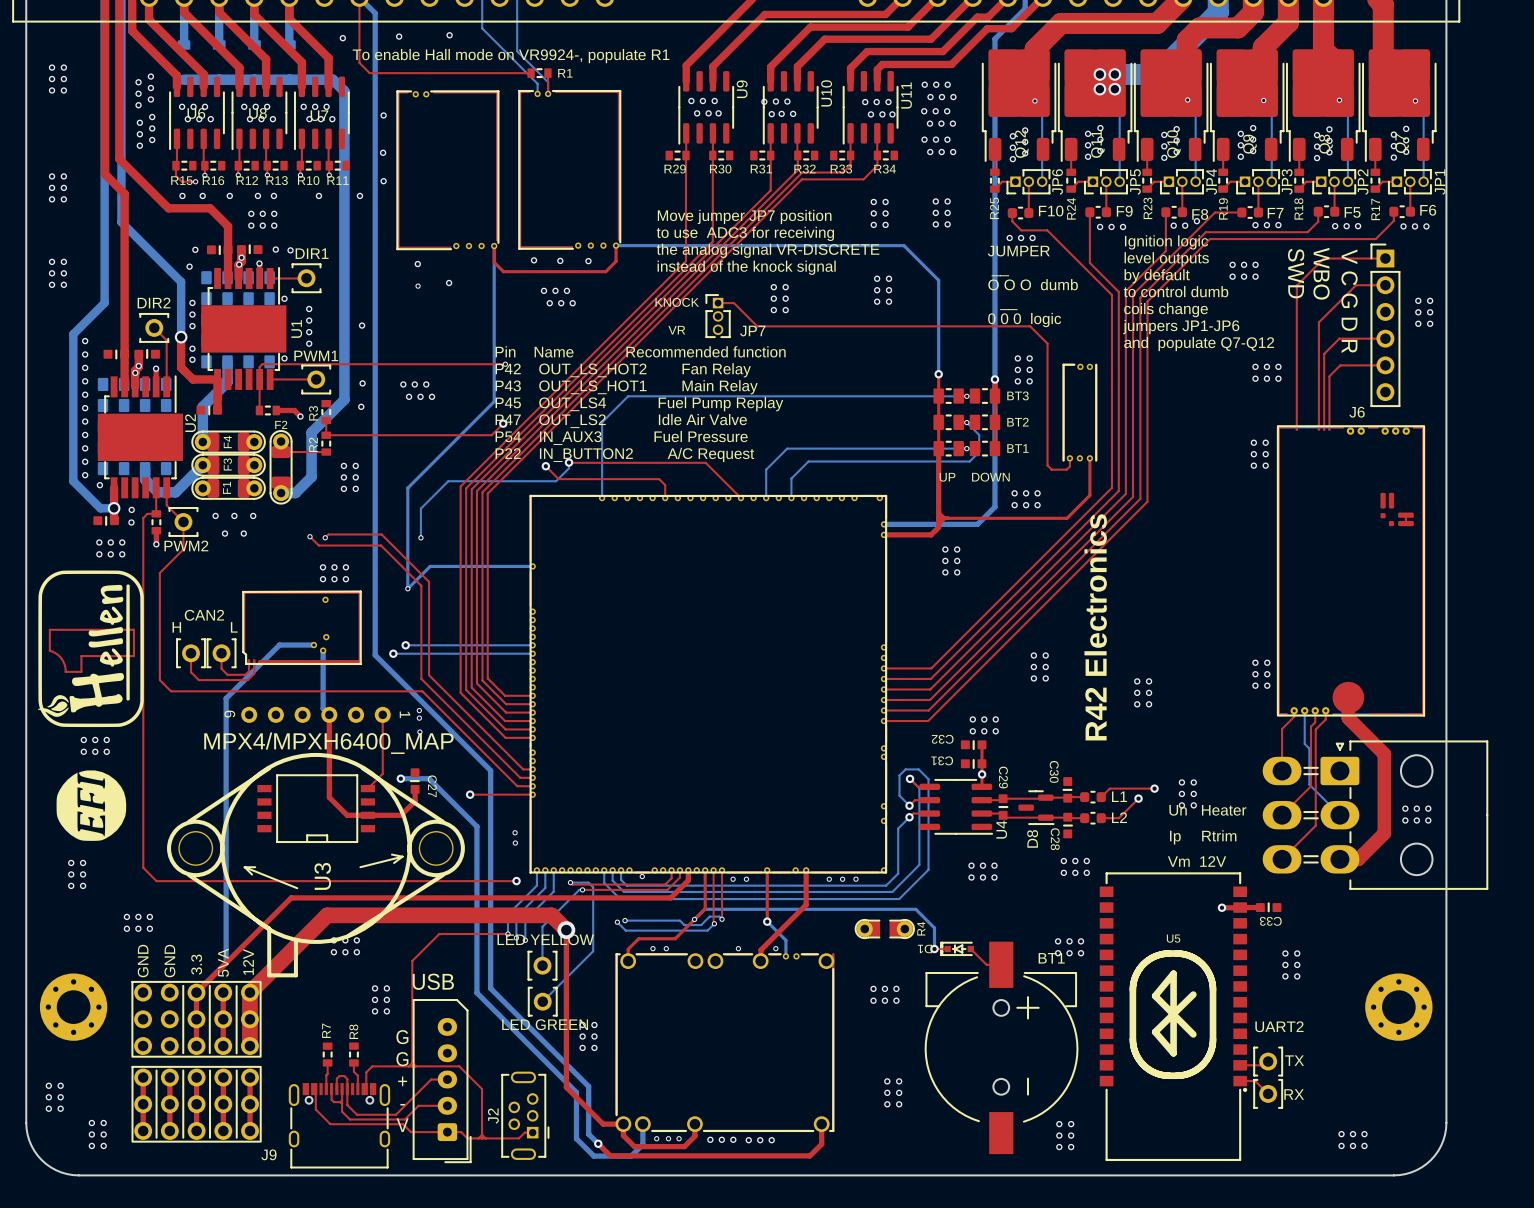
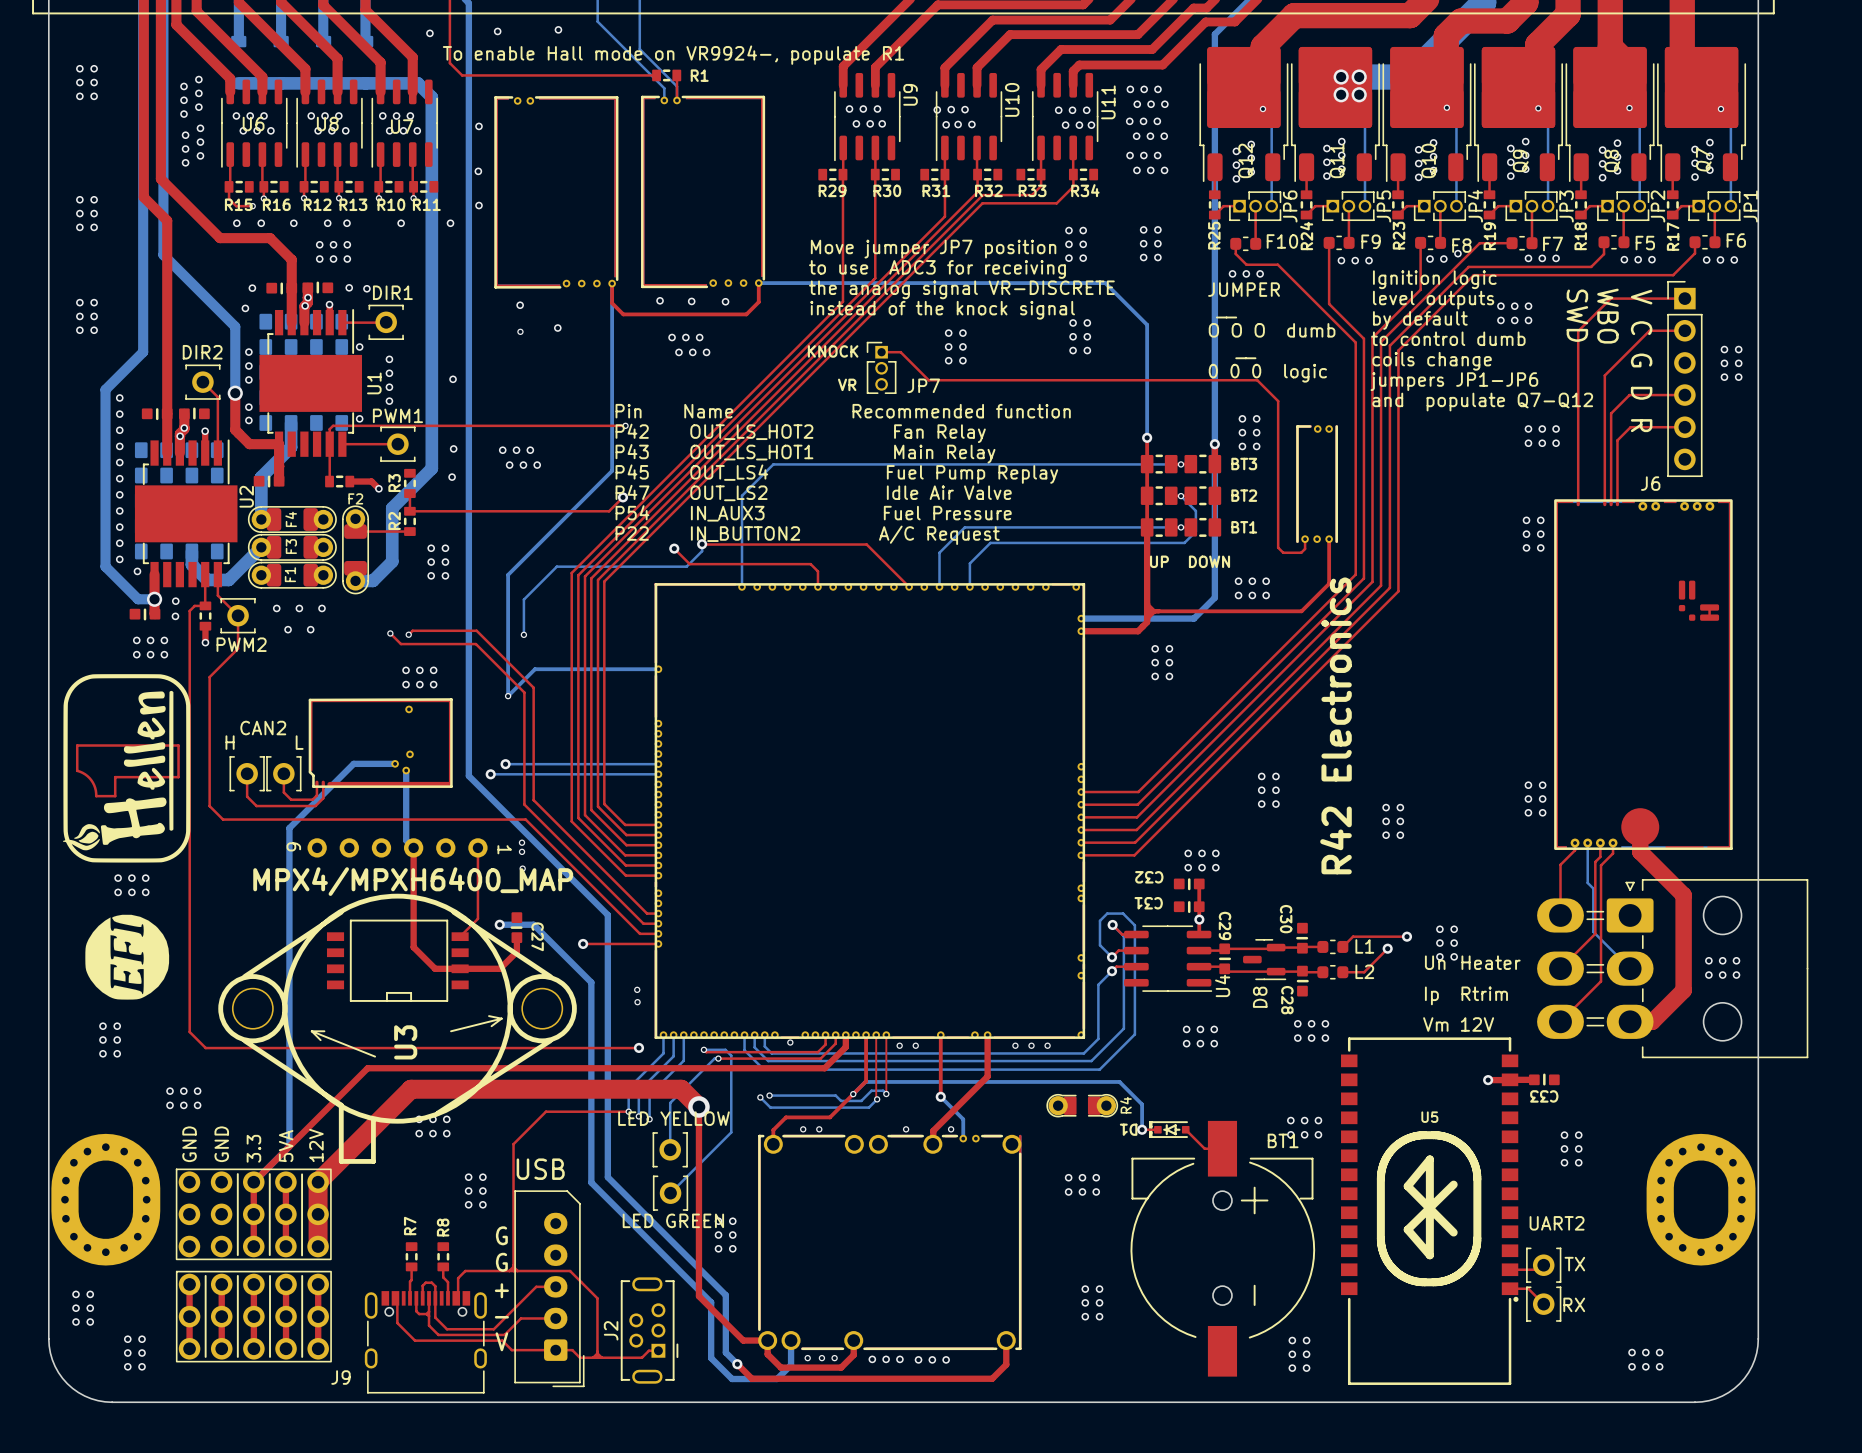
part footprint: [39, 973, 108, 1041] -> [51, 1133, 161, 1266]
part footprint: [1365, 973, 1433, 1041] -> [1646, 1133, 1756, 1266]

